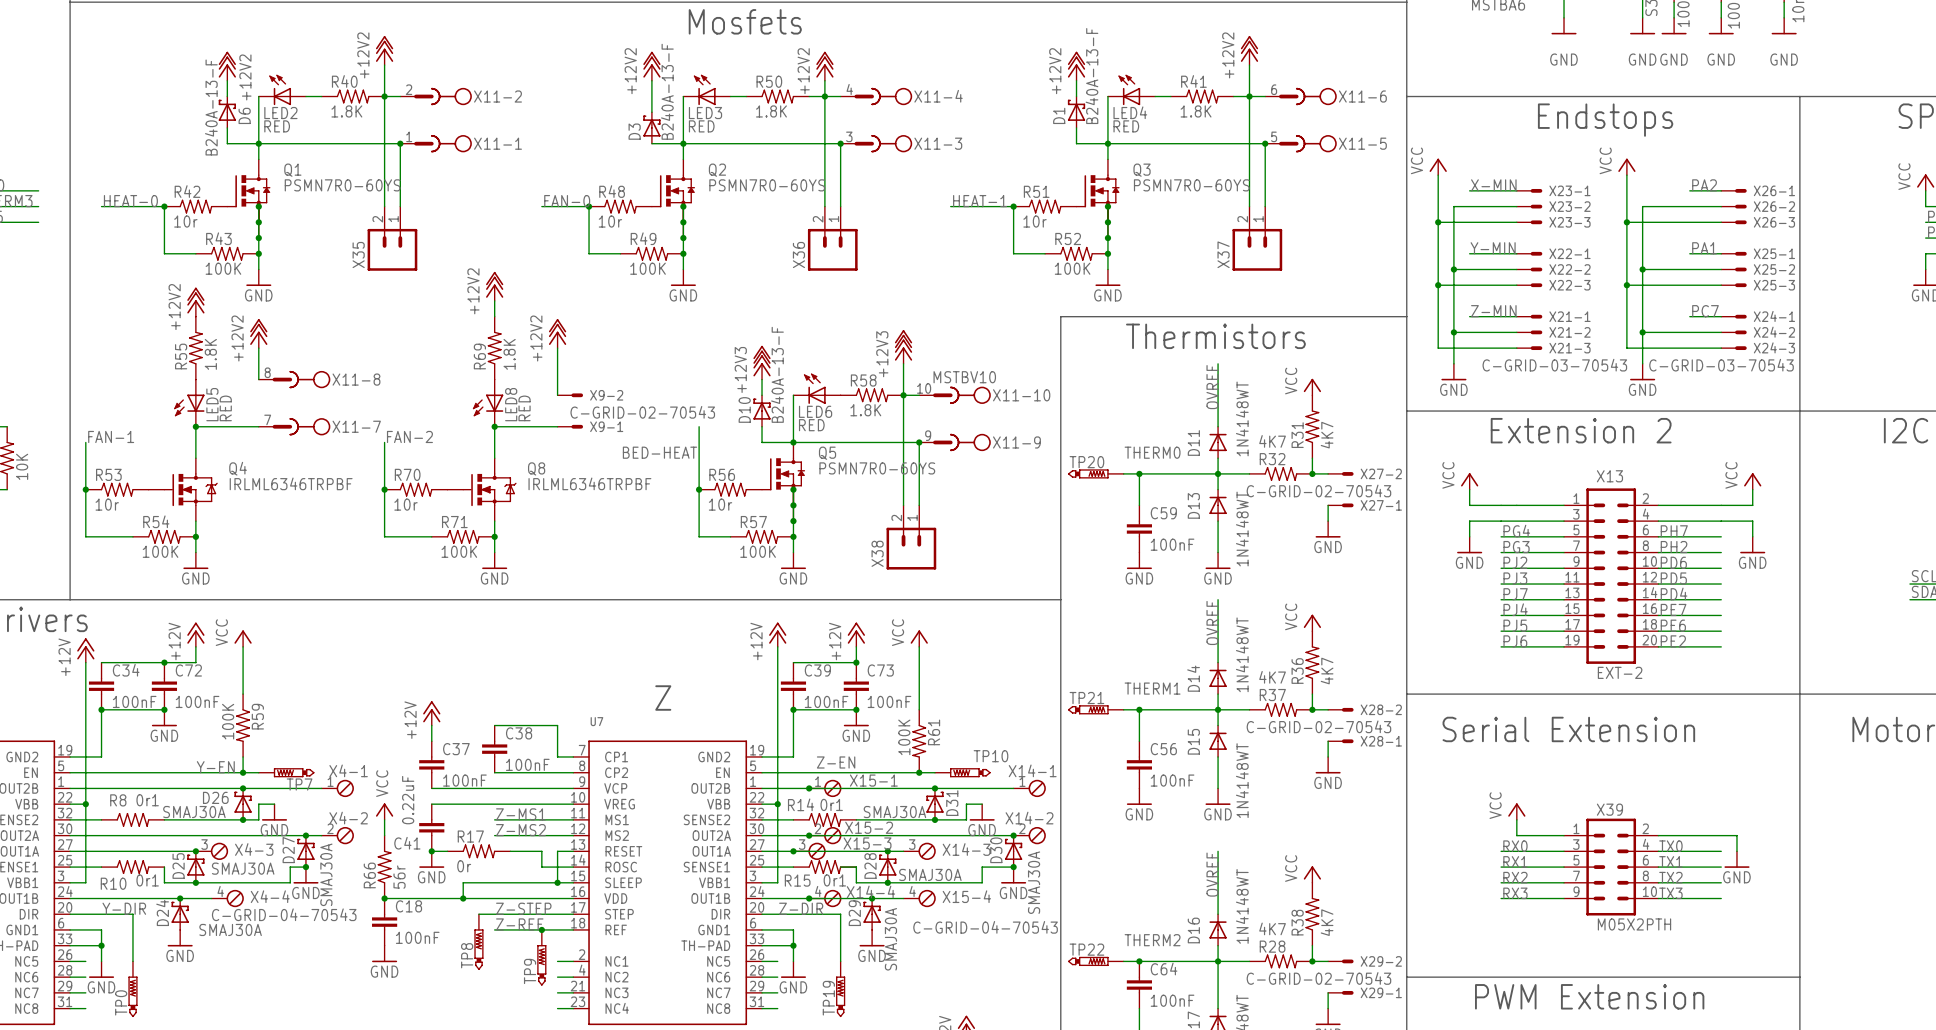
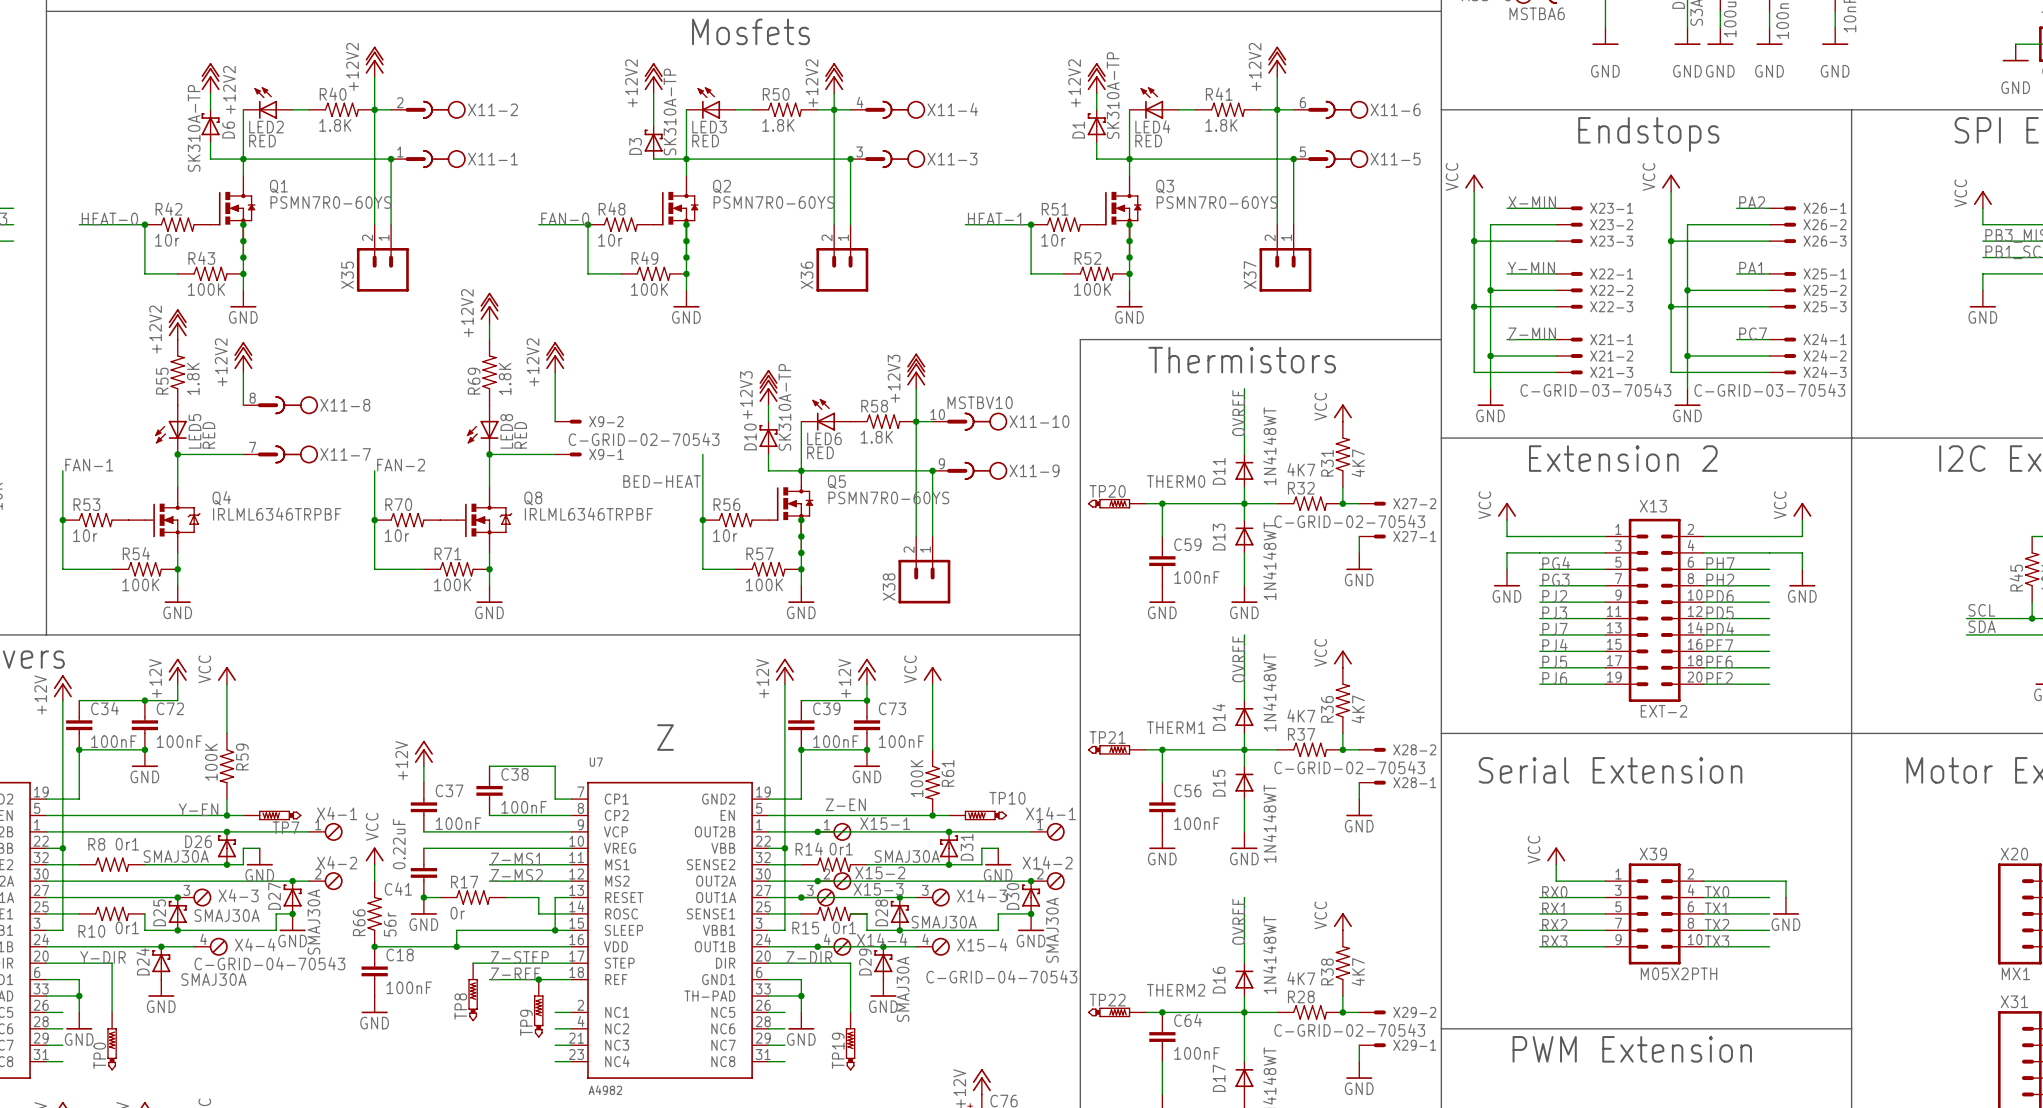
D1 value: B240A-13-F (1091, 76) -> SK310A-TP (1113, 95)
D3 value: B240A-13-F (667, 91) -> SK310A-TP (670, 112)
D6 value: B240A-13-F (211, 107) -> SK310A-TP (194, 128)
D10 value: B240A-13-F (777, 374) -> SK310A-TP (784, 407)

